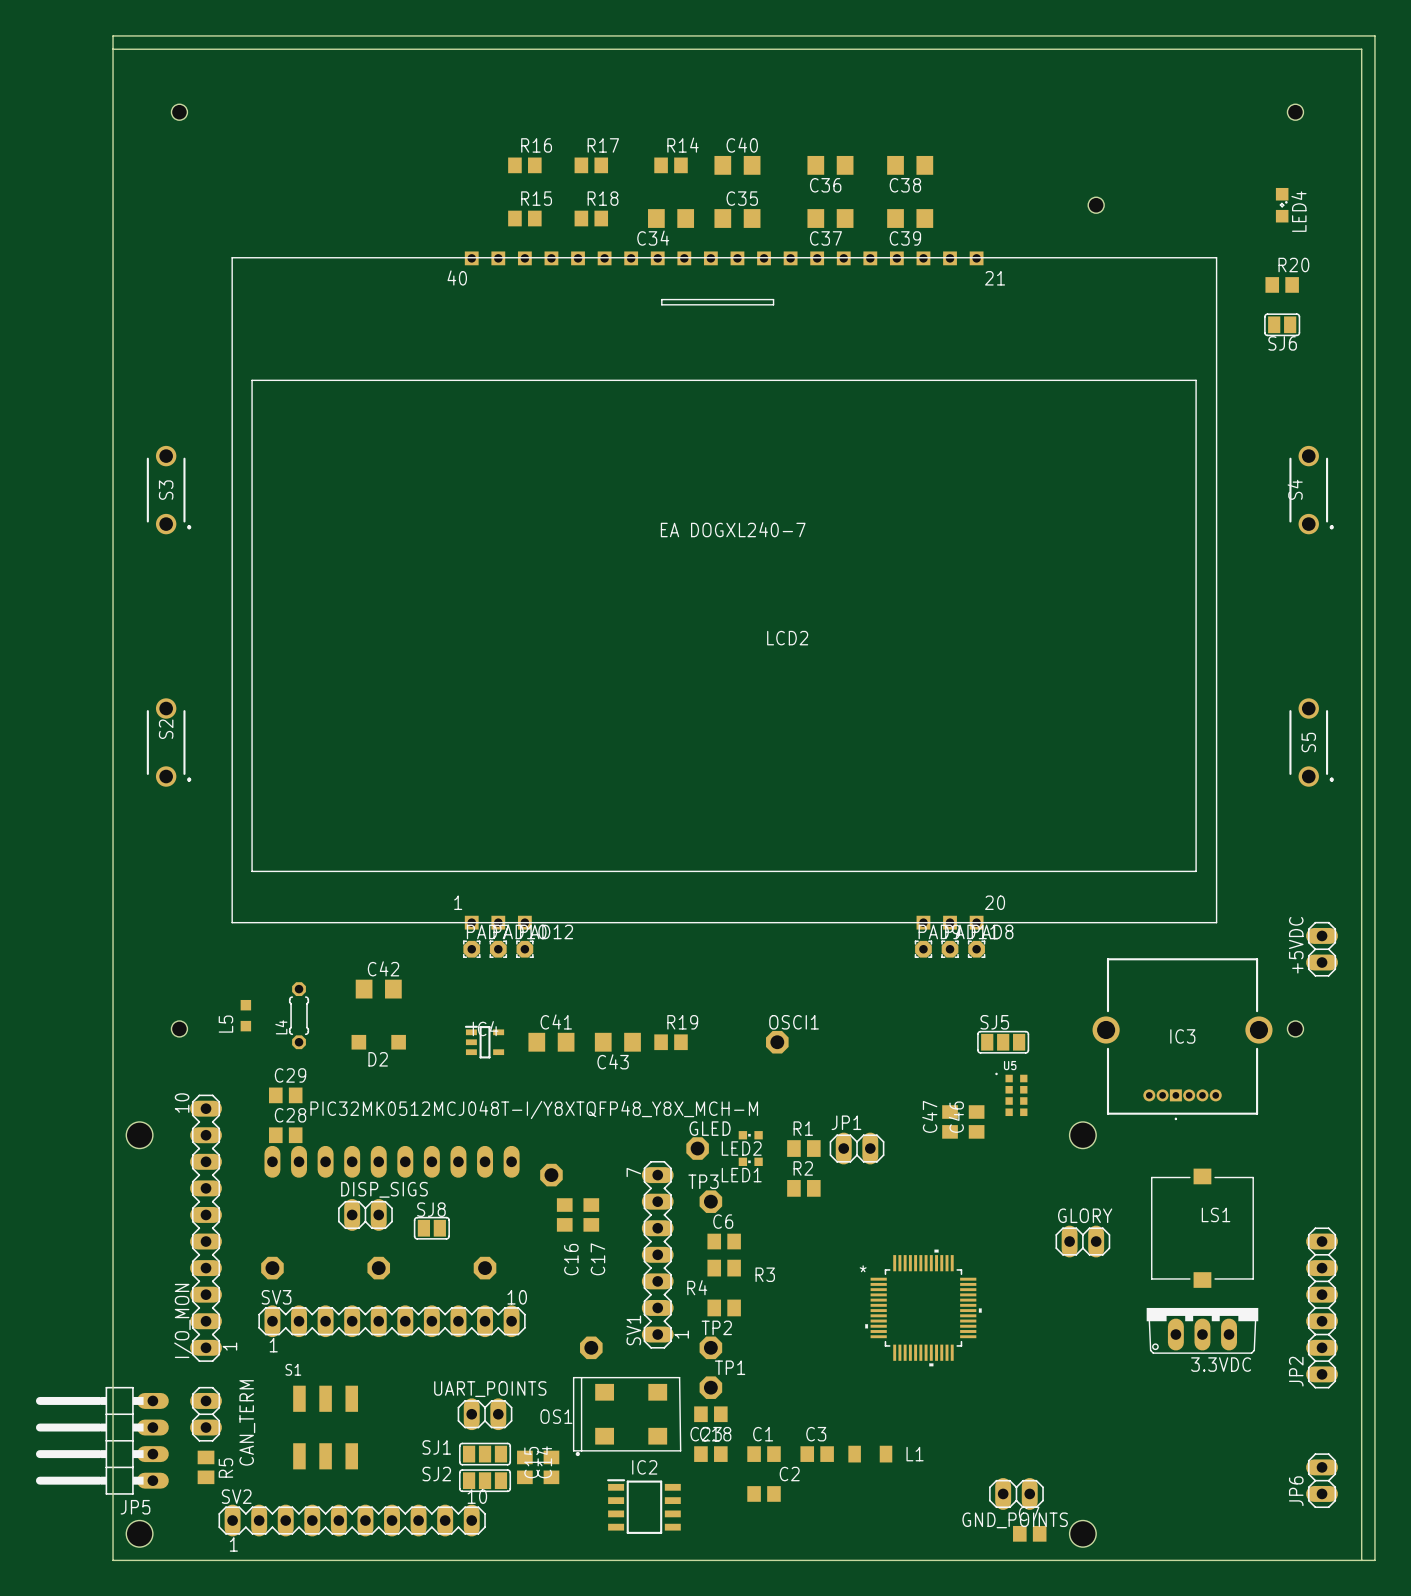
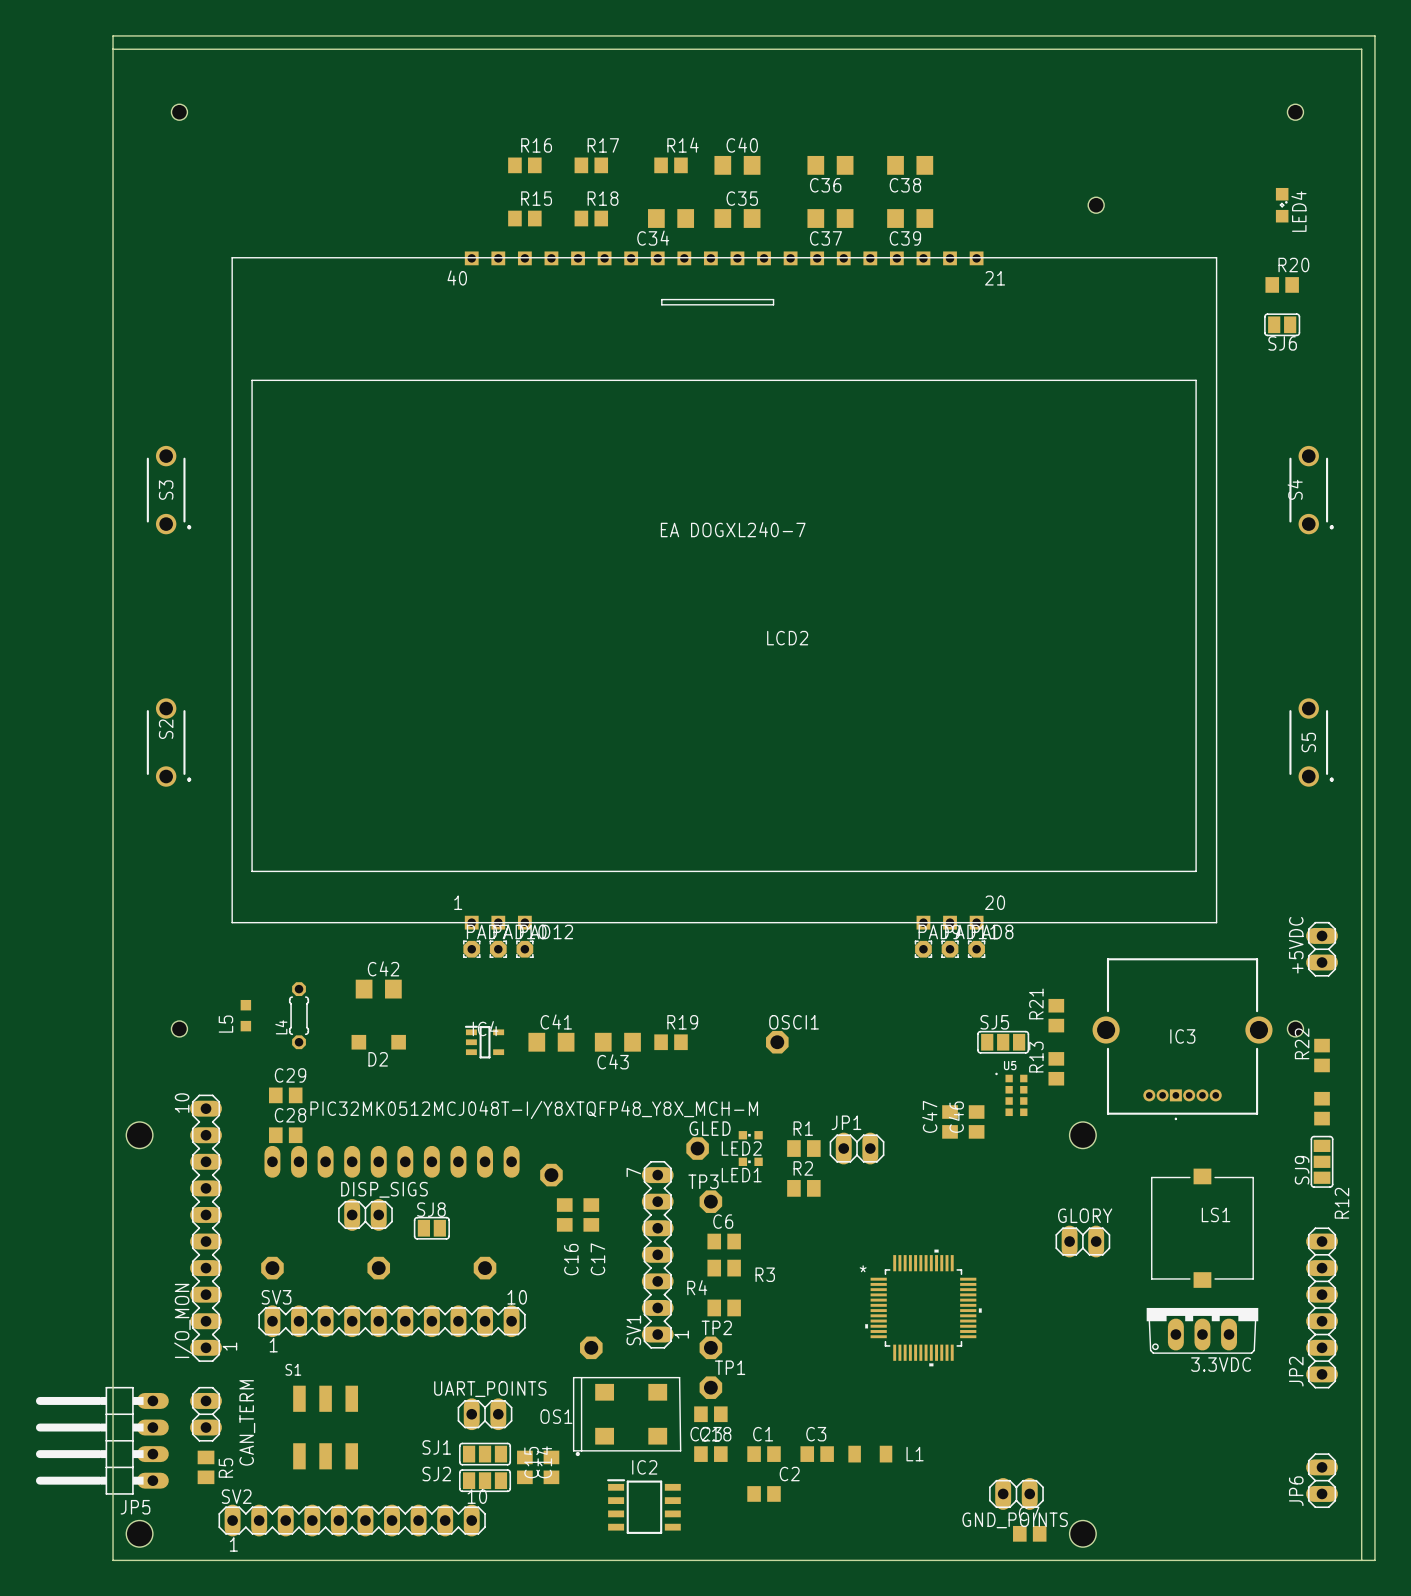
R21: none -> (1056, 1015)
R22: none -> (1322, 1055)
R13: none -> (1056, 1068)
R12: none -> (1322, 1108)
SJ9: none -> (1322, 1161)

